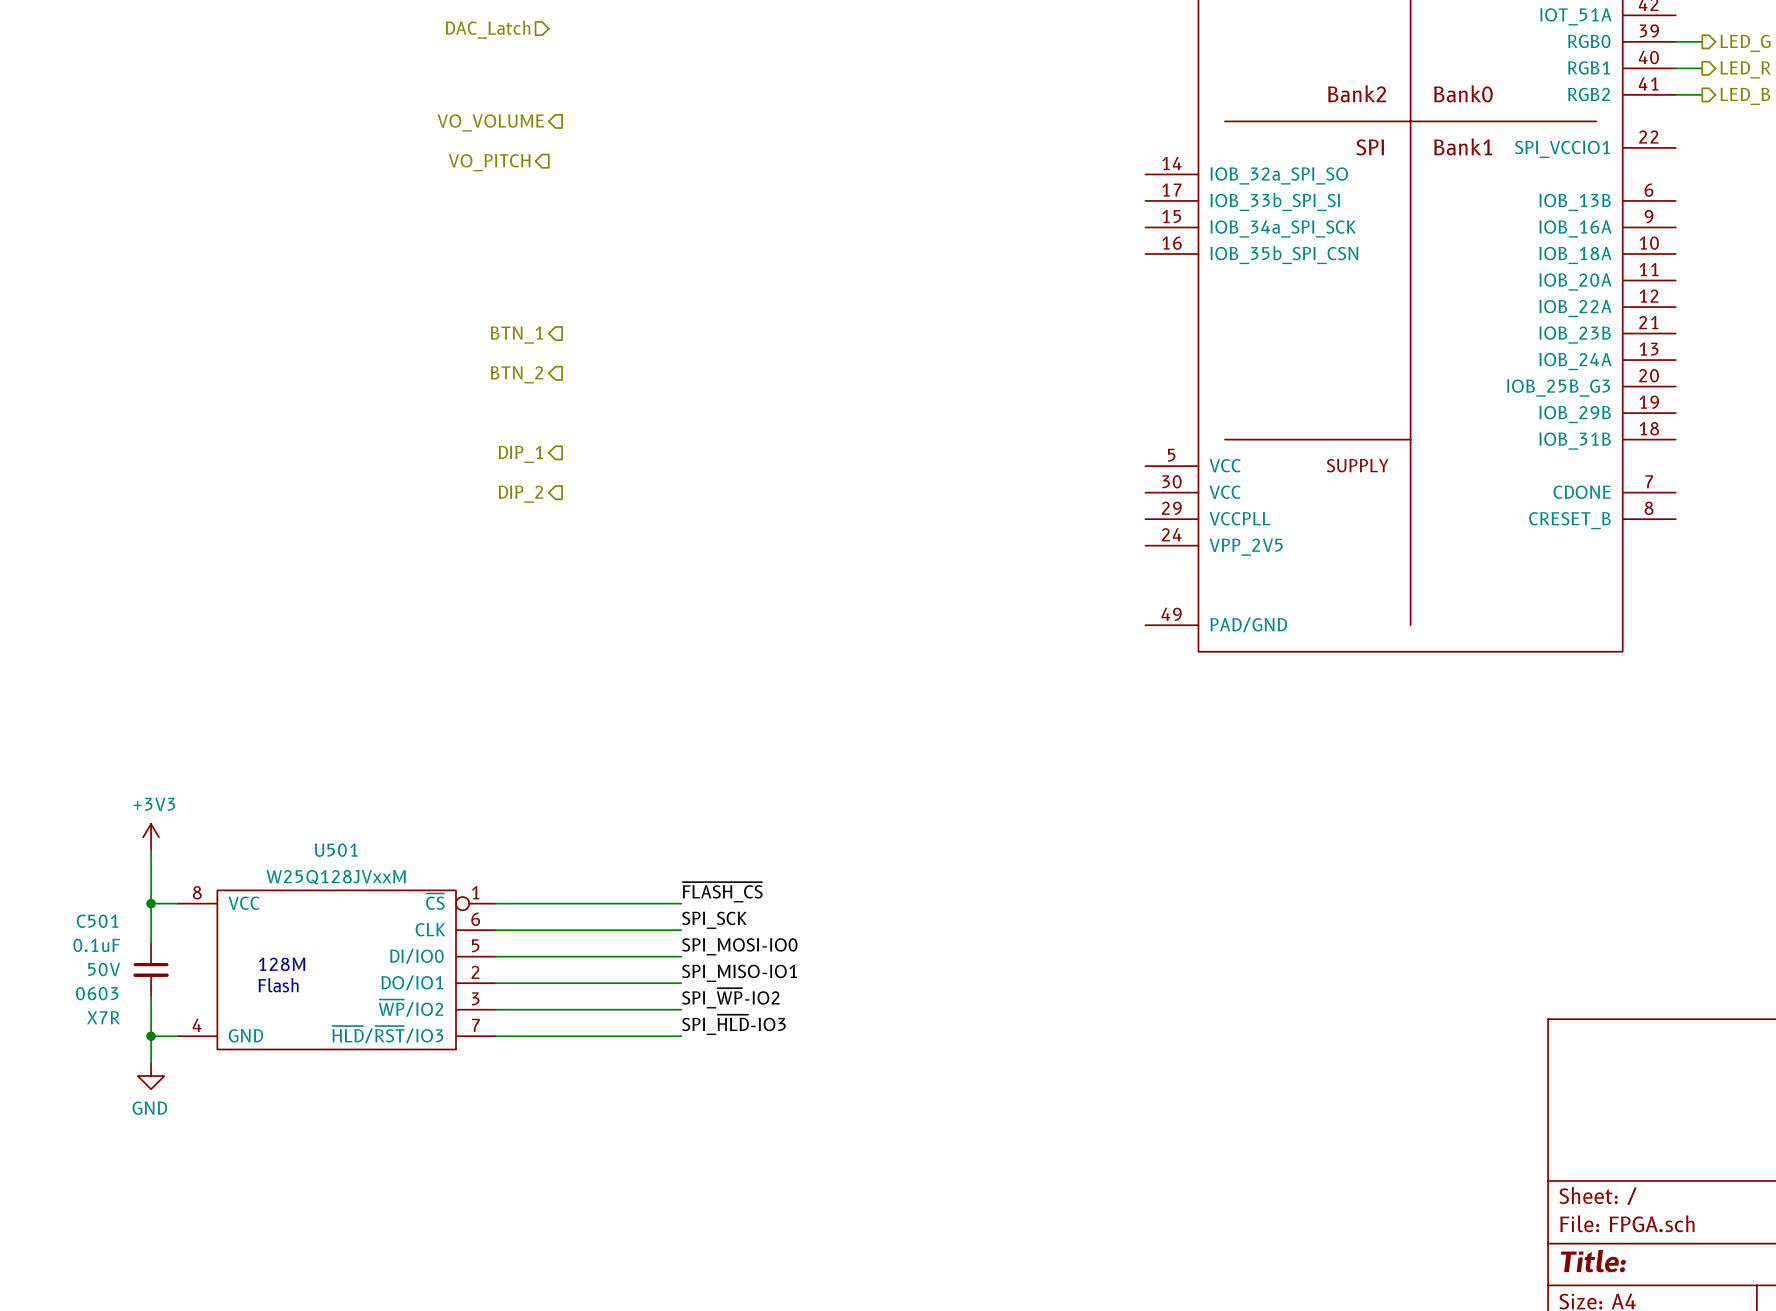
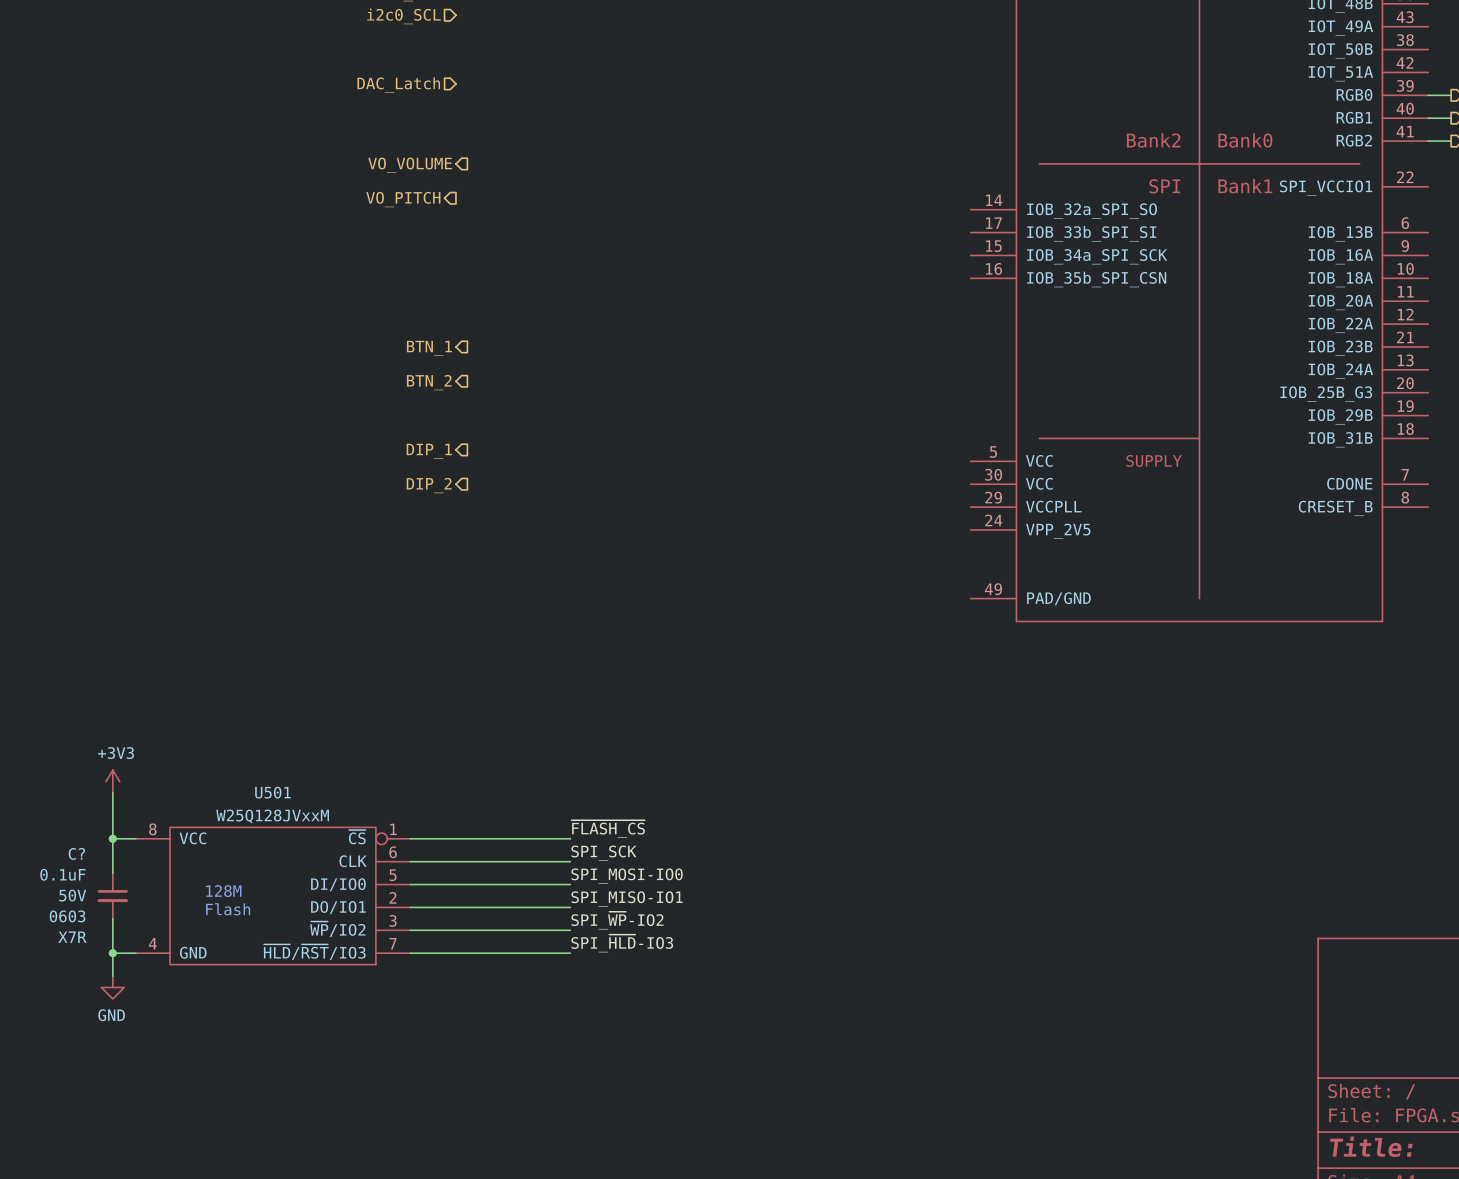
C501 name: C501 (97, 921) -> C? (76, 853)

